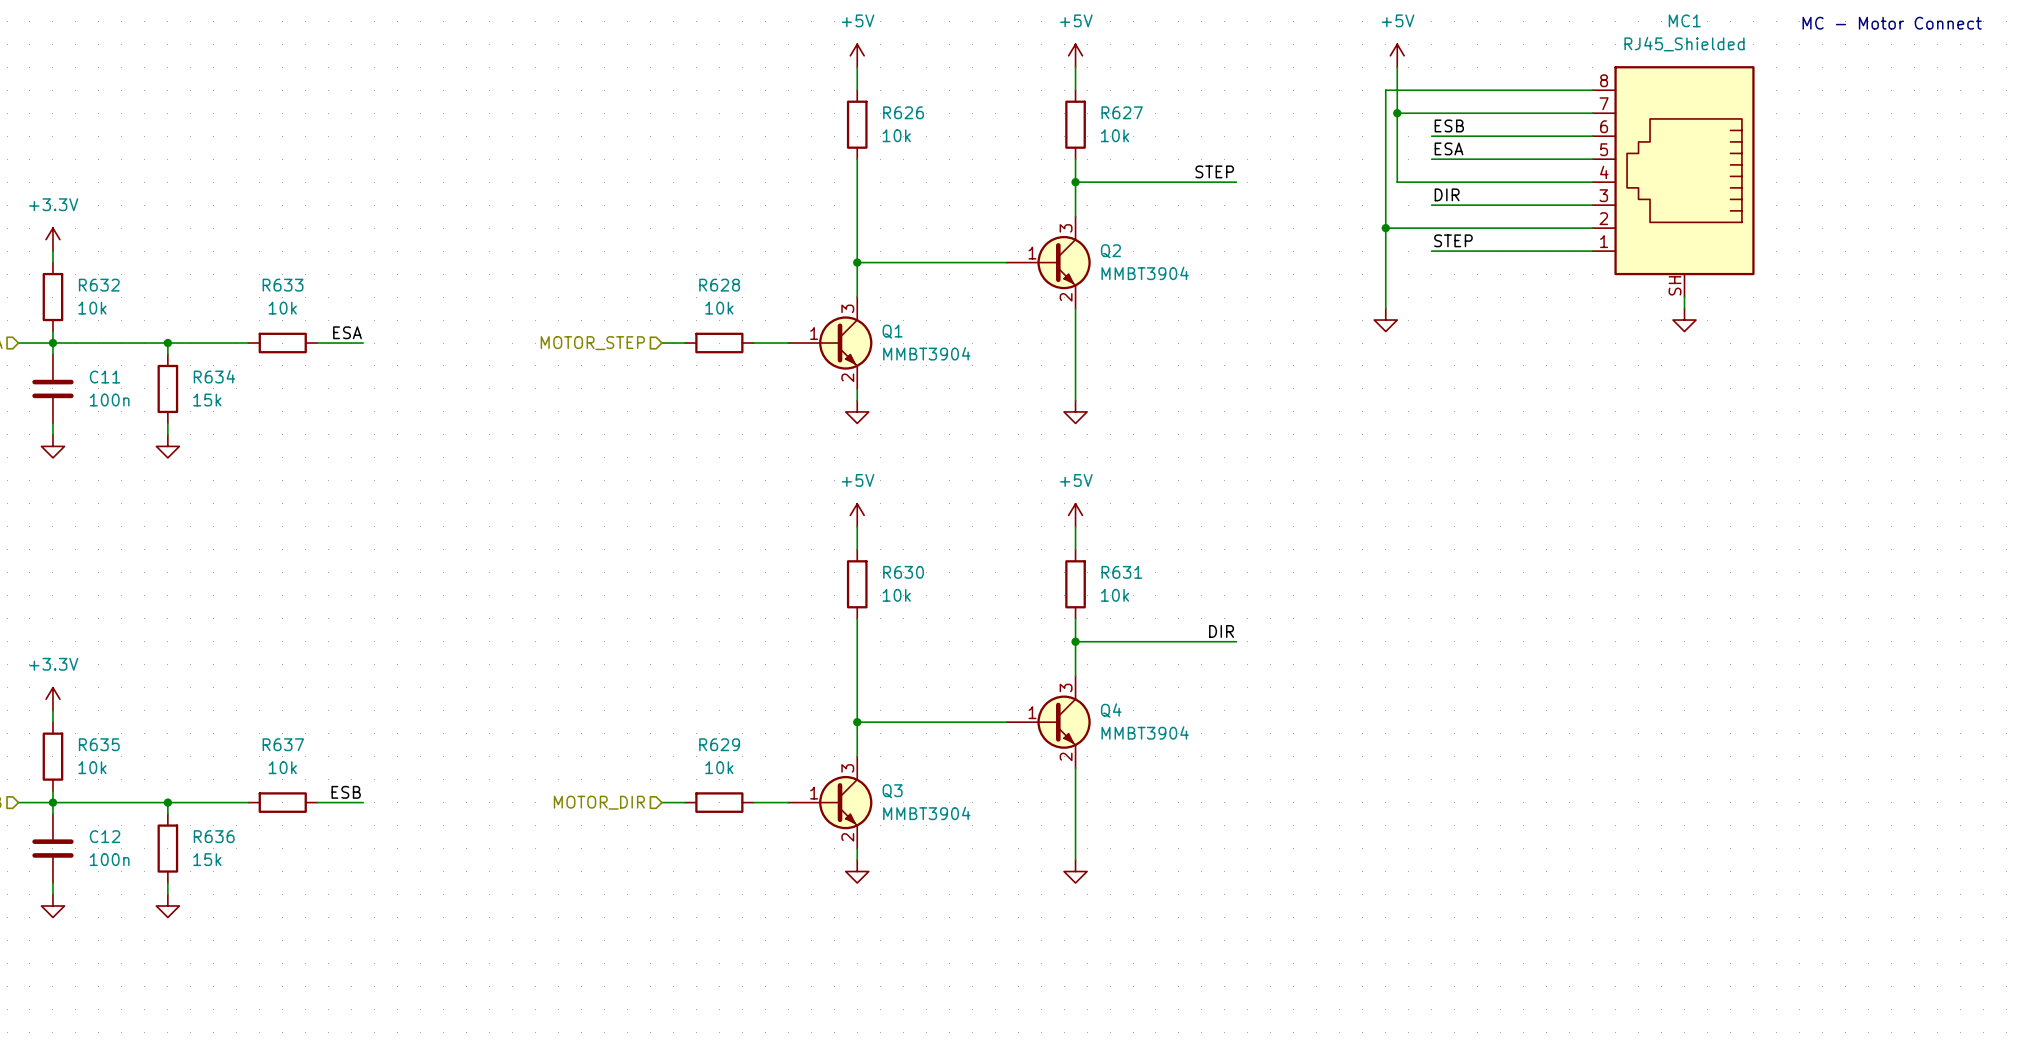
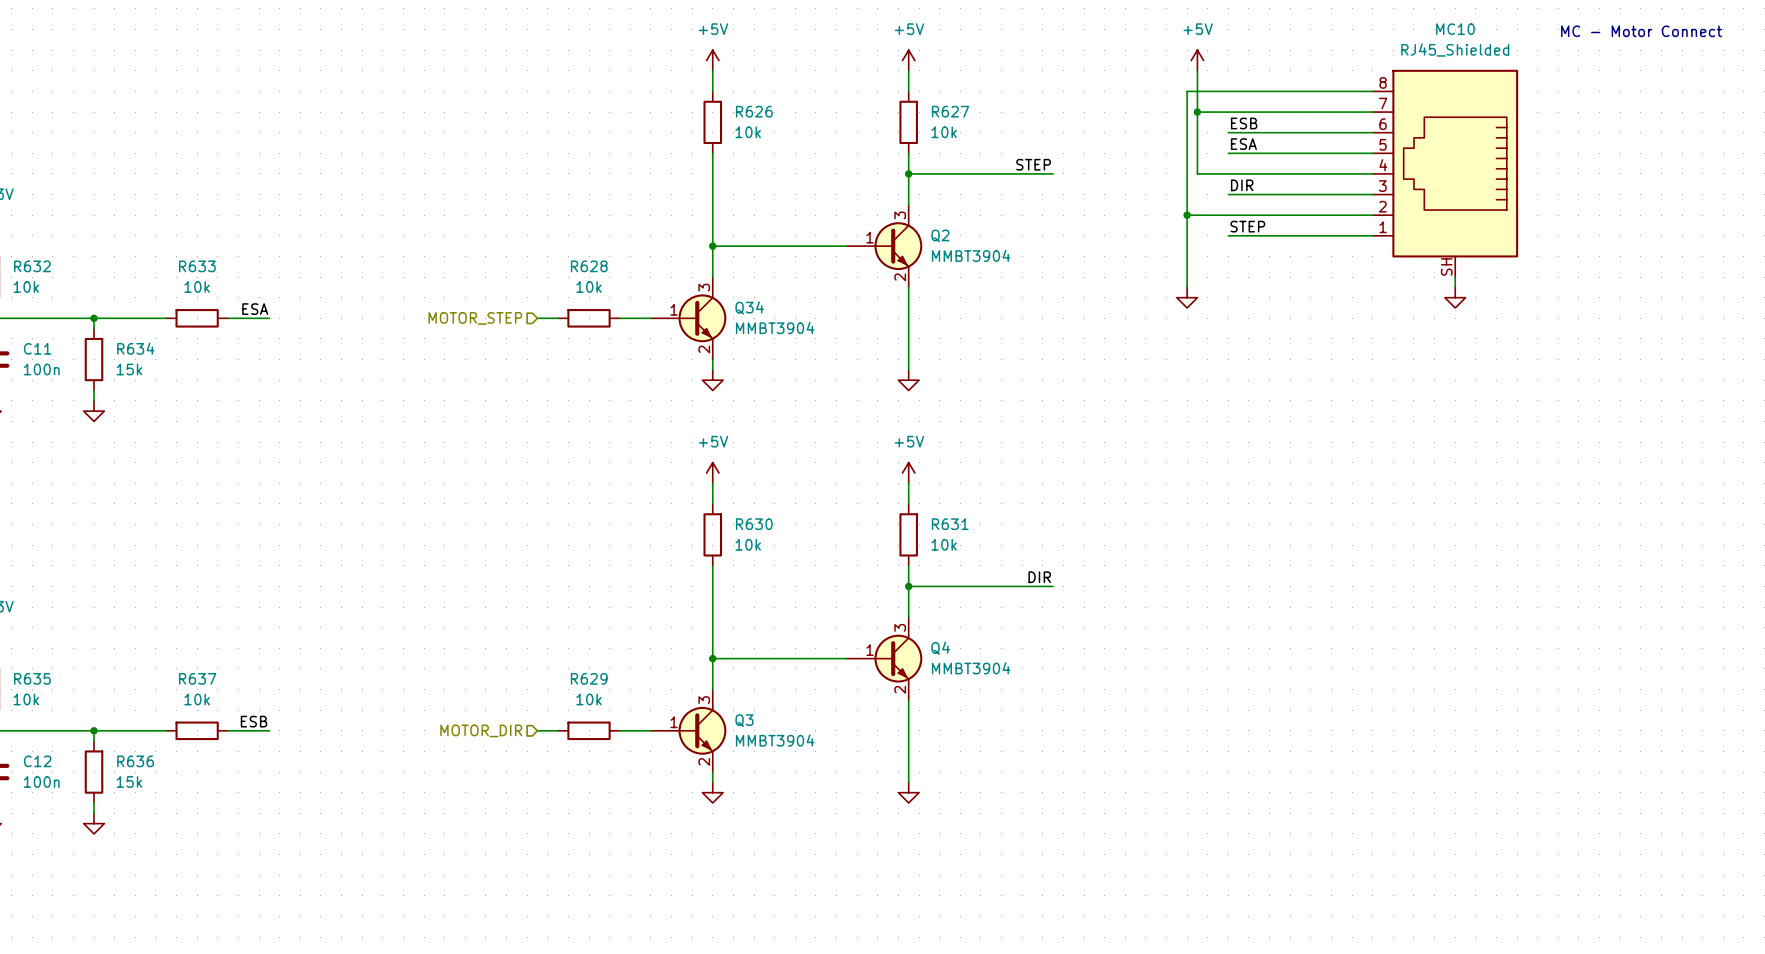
MC1 name: MC1 (1684, 20) -> MC10 (1455, 29)
Q1 name: Q1 (892, 331) -> Q34 (749, 307)

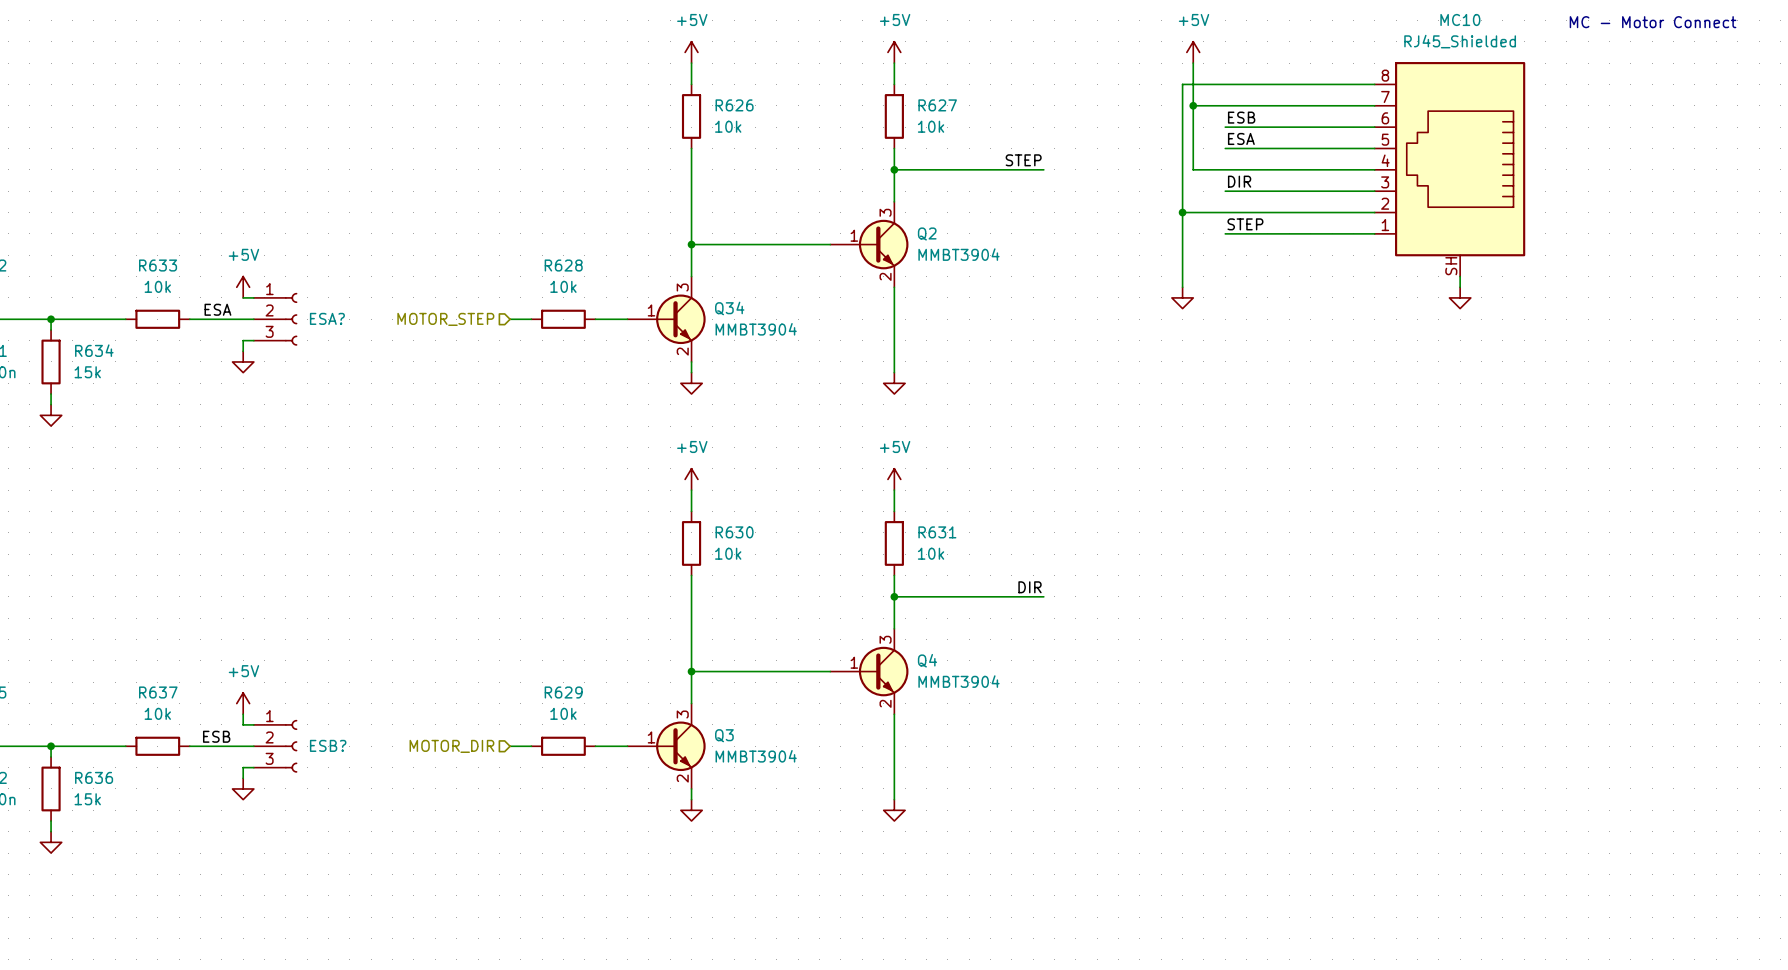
power symbol: none -> +5V (243, 287)
wire: none -> (243, 297) (253, 297)
wire: none -> (232, 319) (253, 319)
ESA?: none -> (275, 319)
wire: none -> (253, 340) (243, 340) (243, 351)
power symbol: none -> (243, 361)
power symbol: none -> +5V (243, 703)
wire: none -> (243, 714) (243, 724) (253, 724)
wire: none -> (232, 746) (253, 746)
ESB?: none -> (275, 746)
wire: none -> (253, 767) (243, 767) (243, 778)
power symbol: none -> (243, 788)

